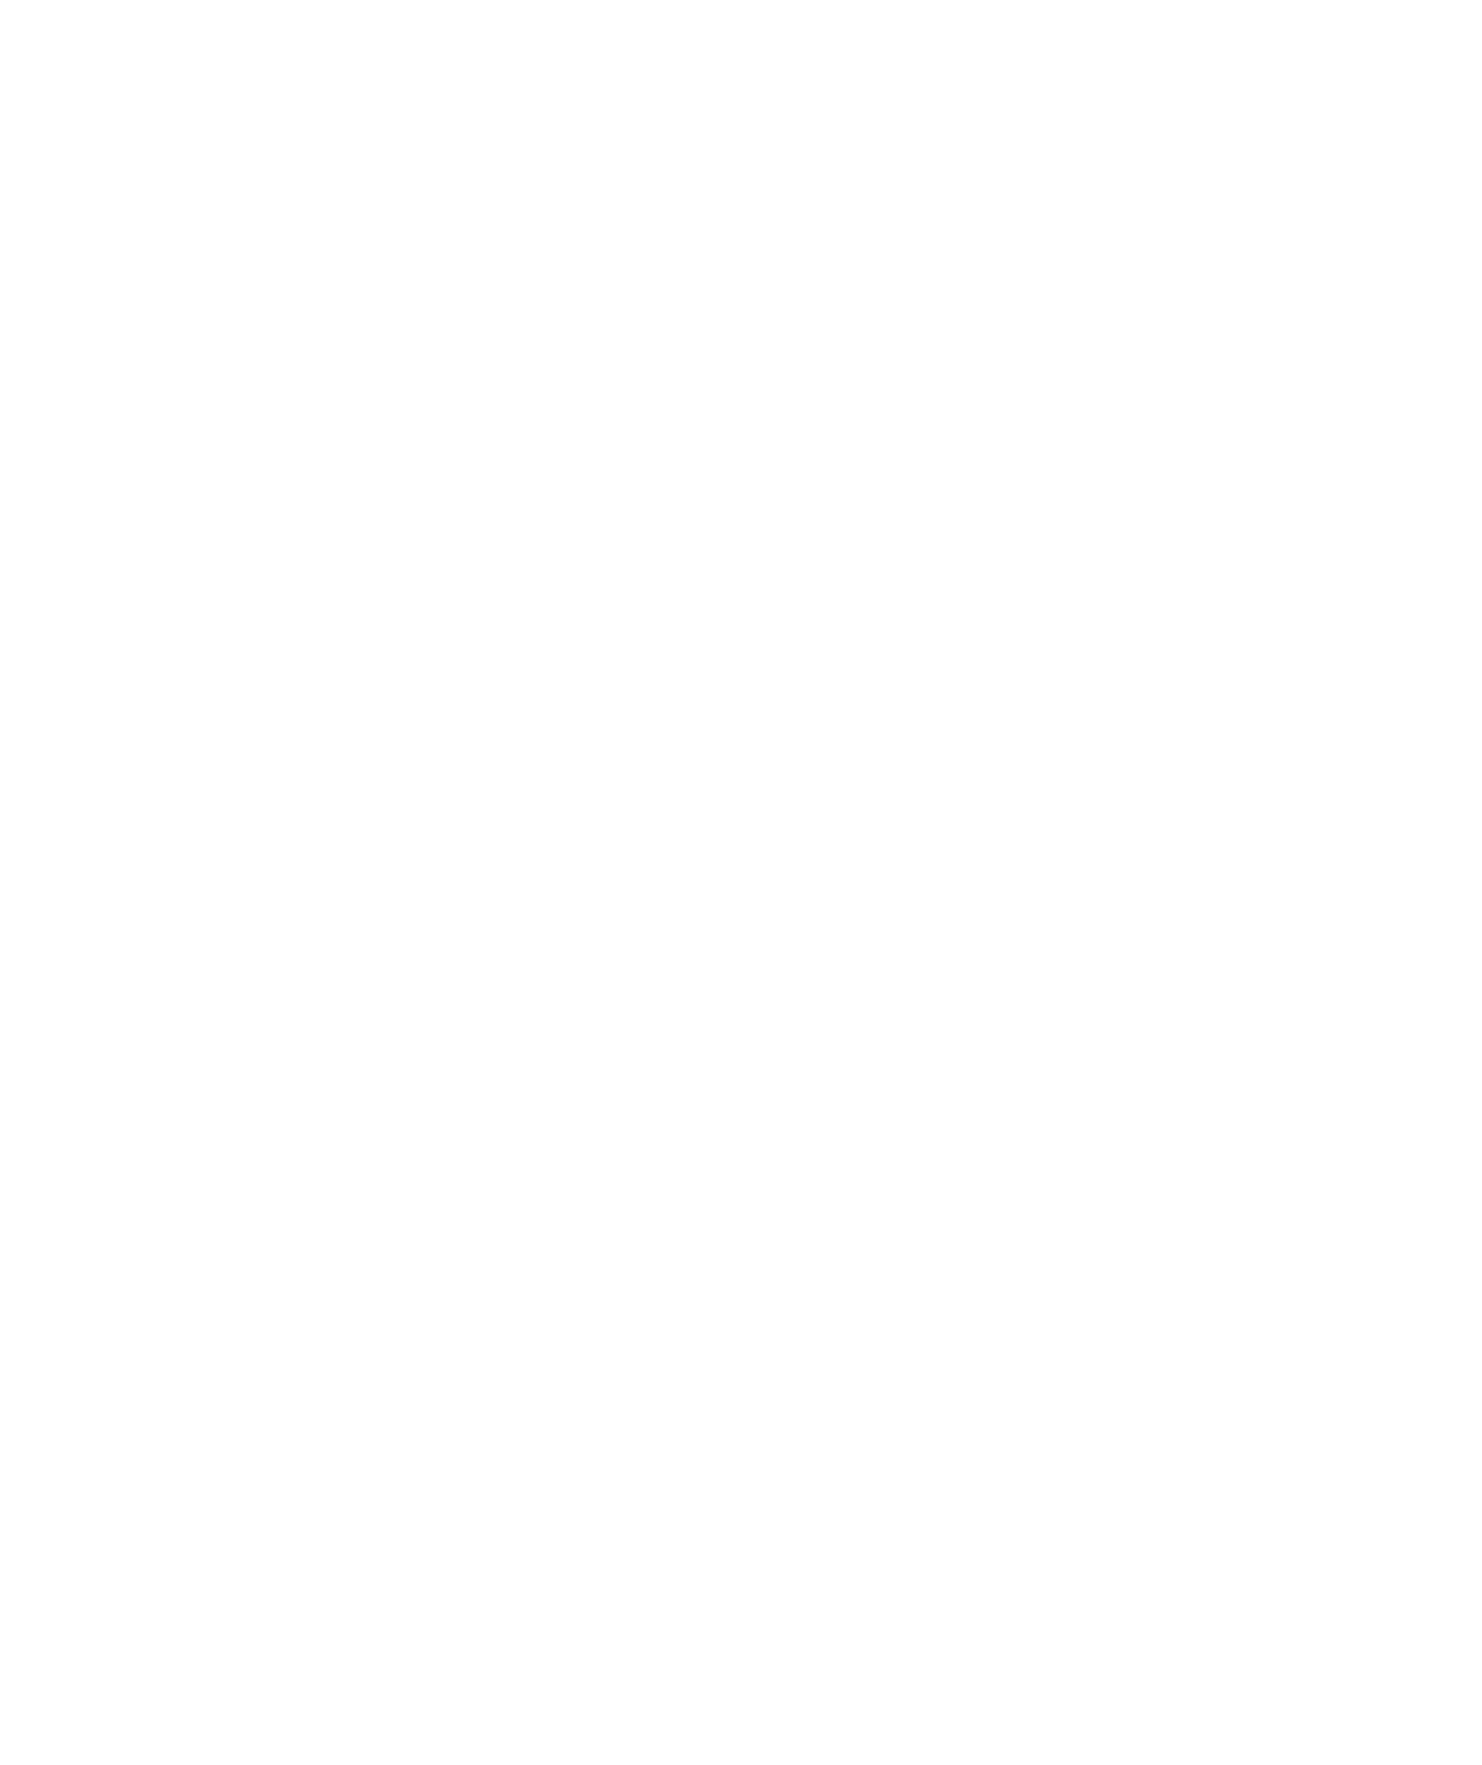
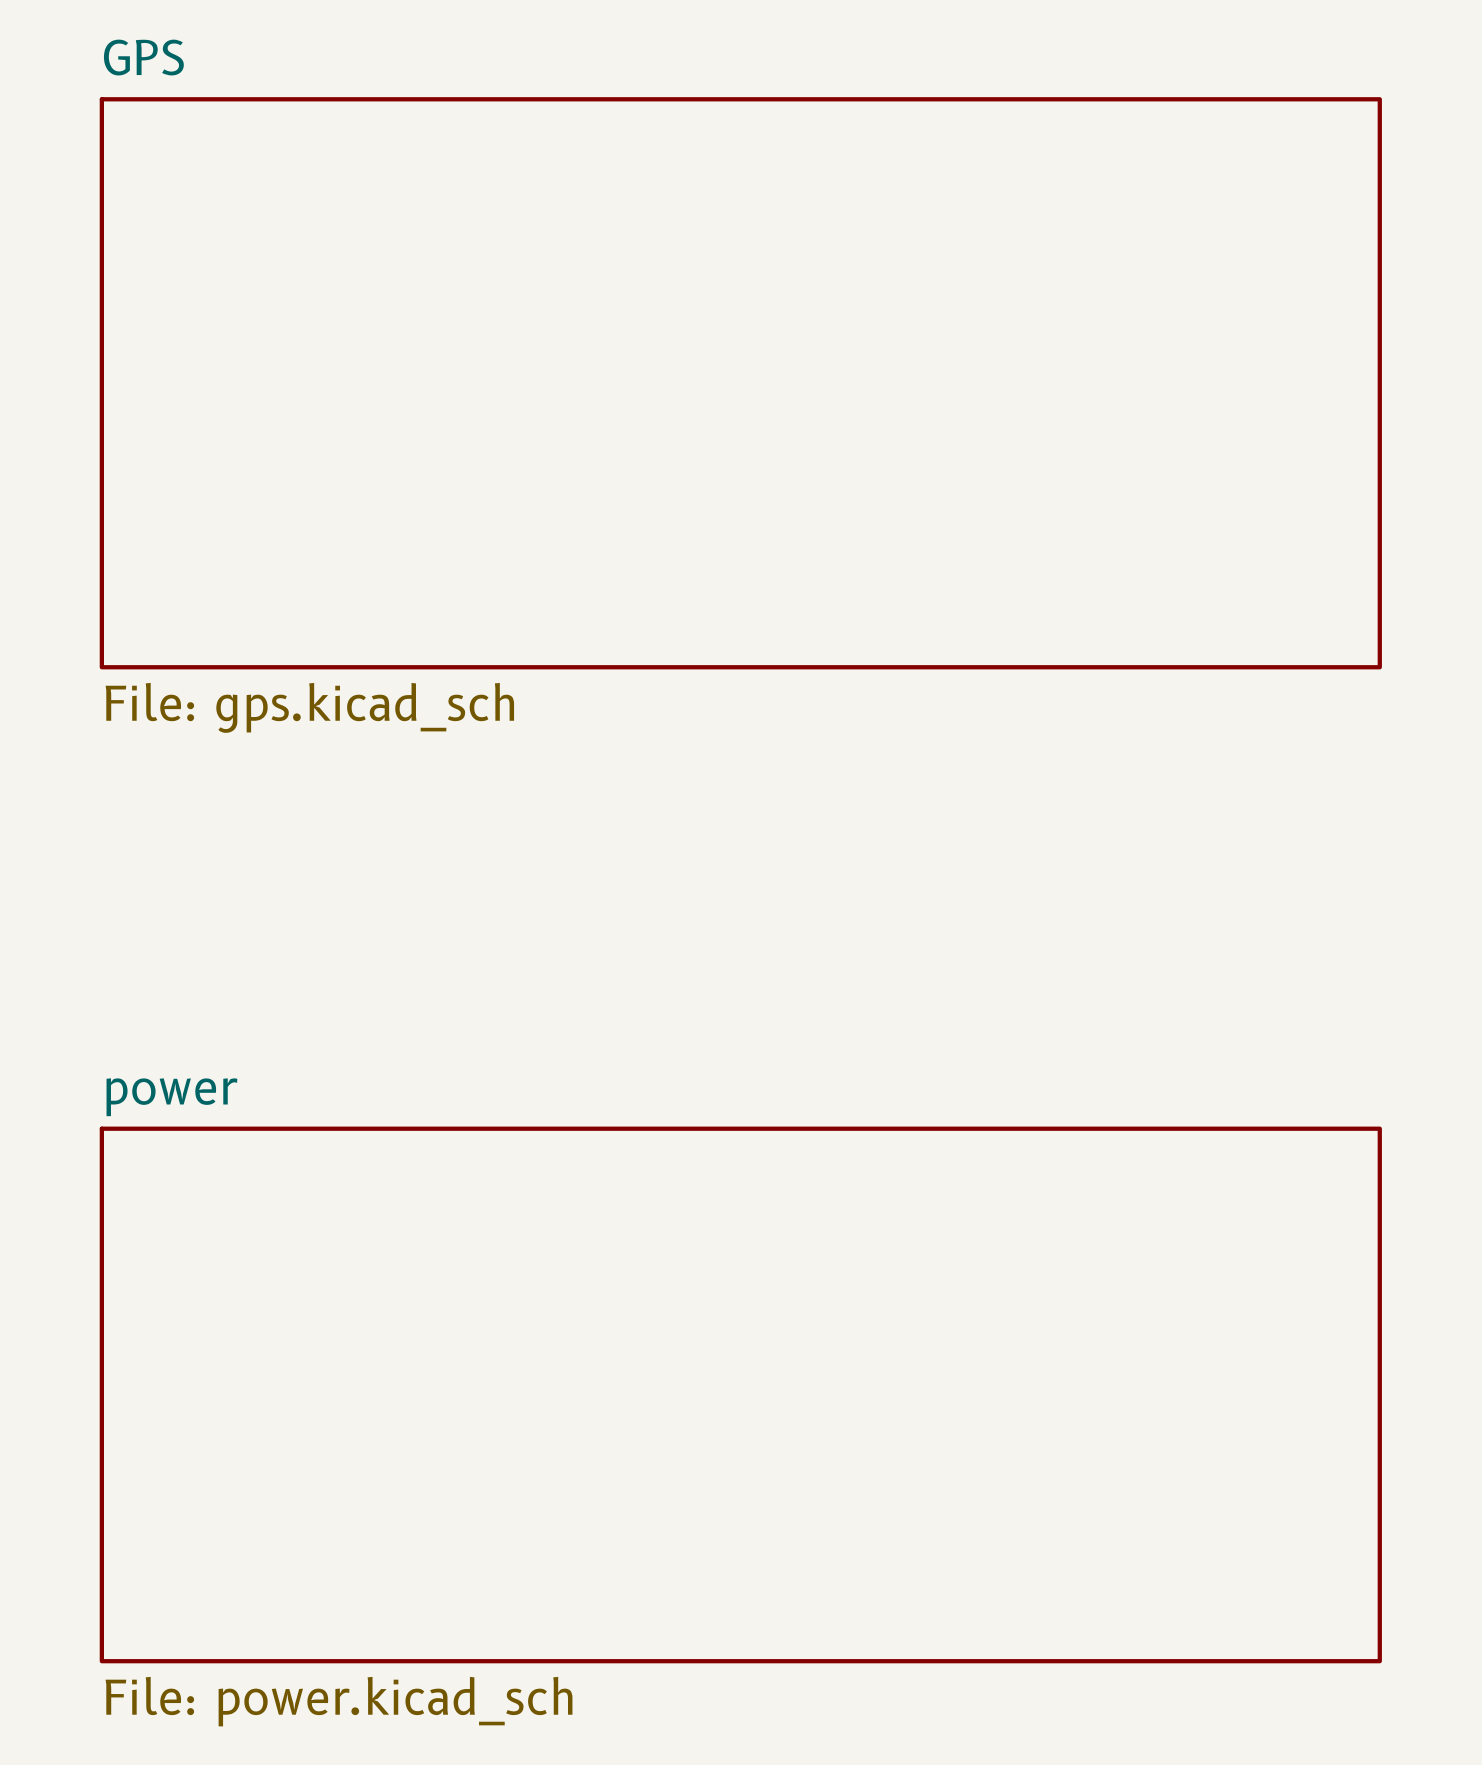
sheet GPS: none -> File: gps.kicad_sch (740, 383)
sheet power: none -> File: power.kicad_sch (740, 1394)

